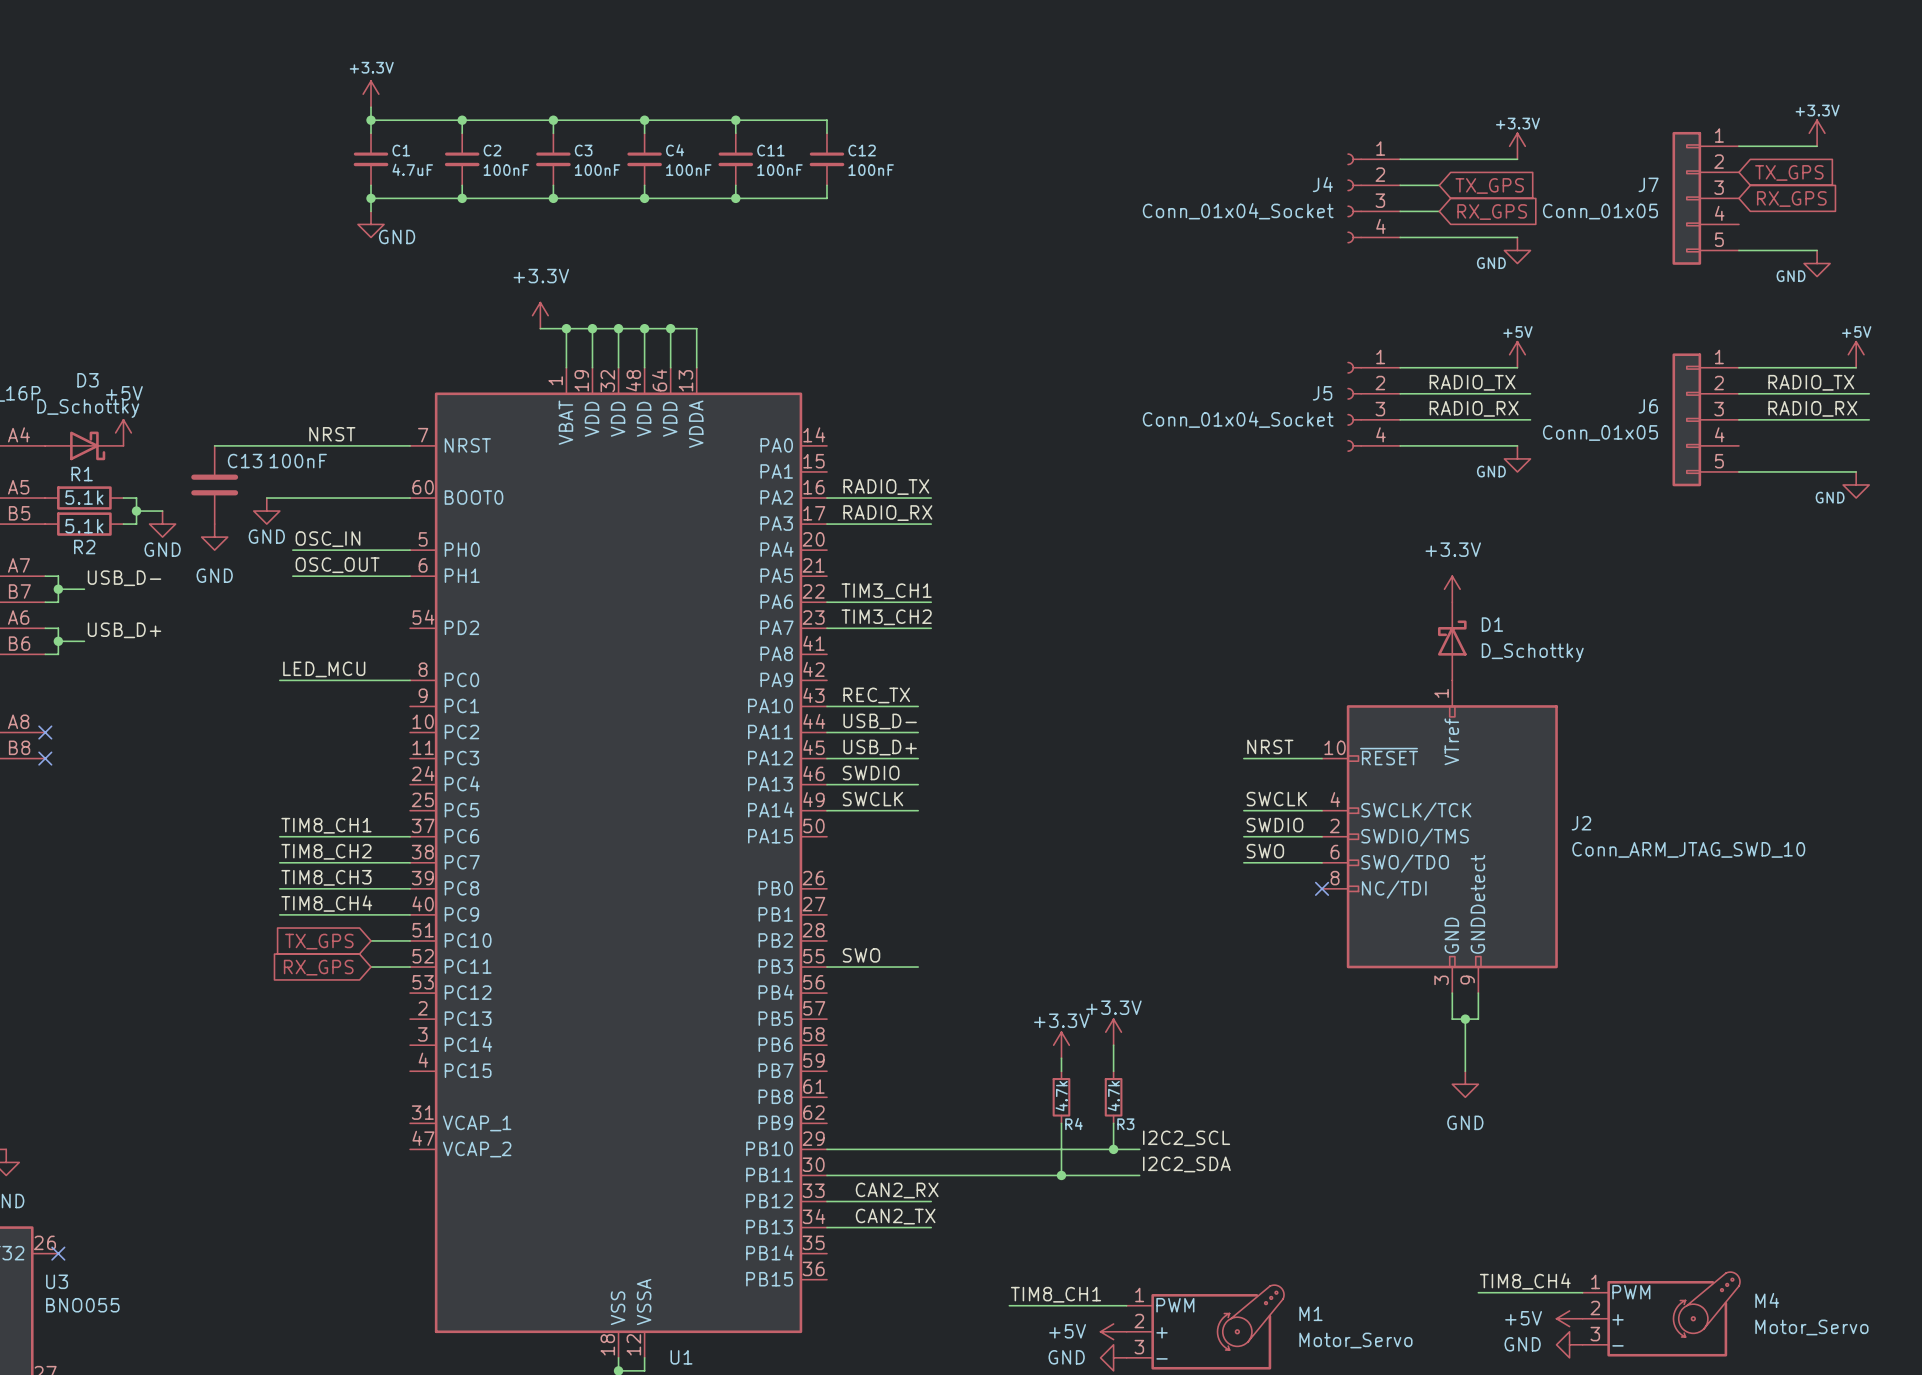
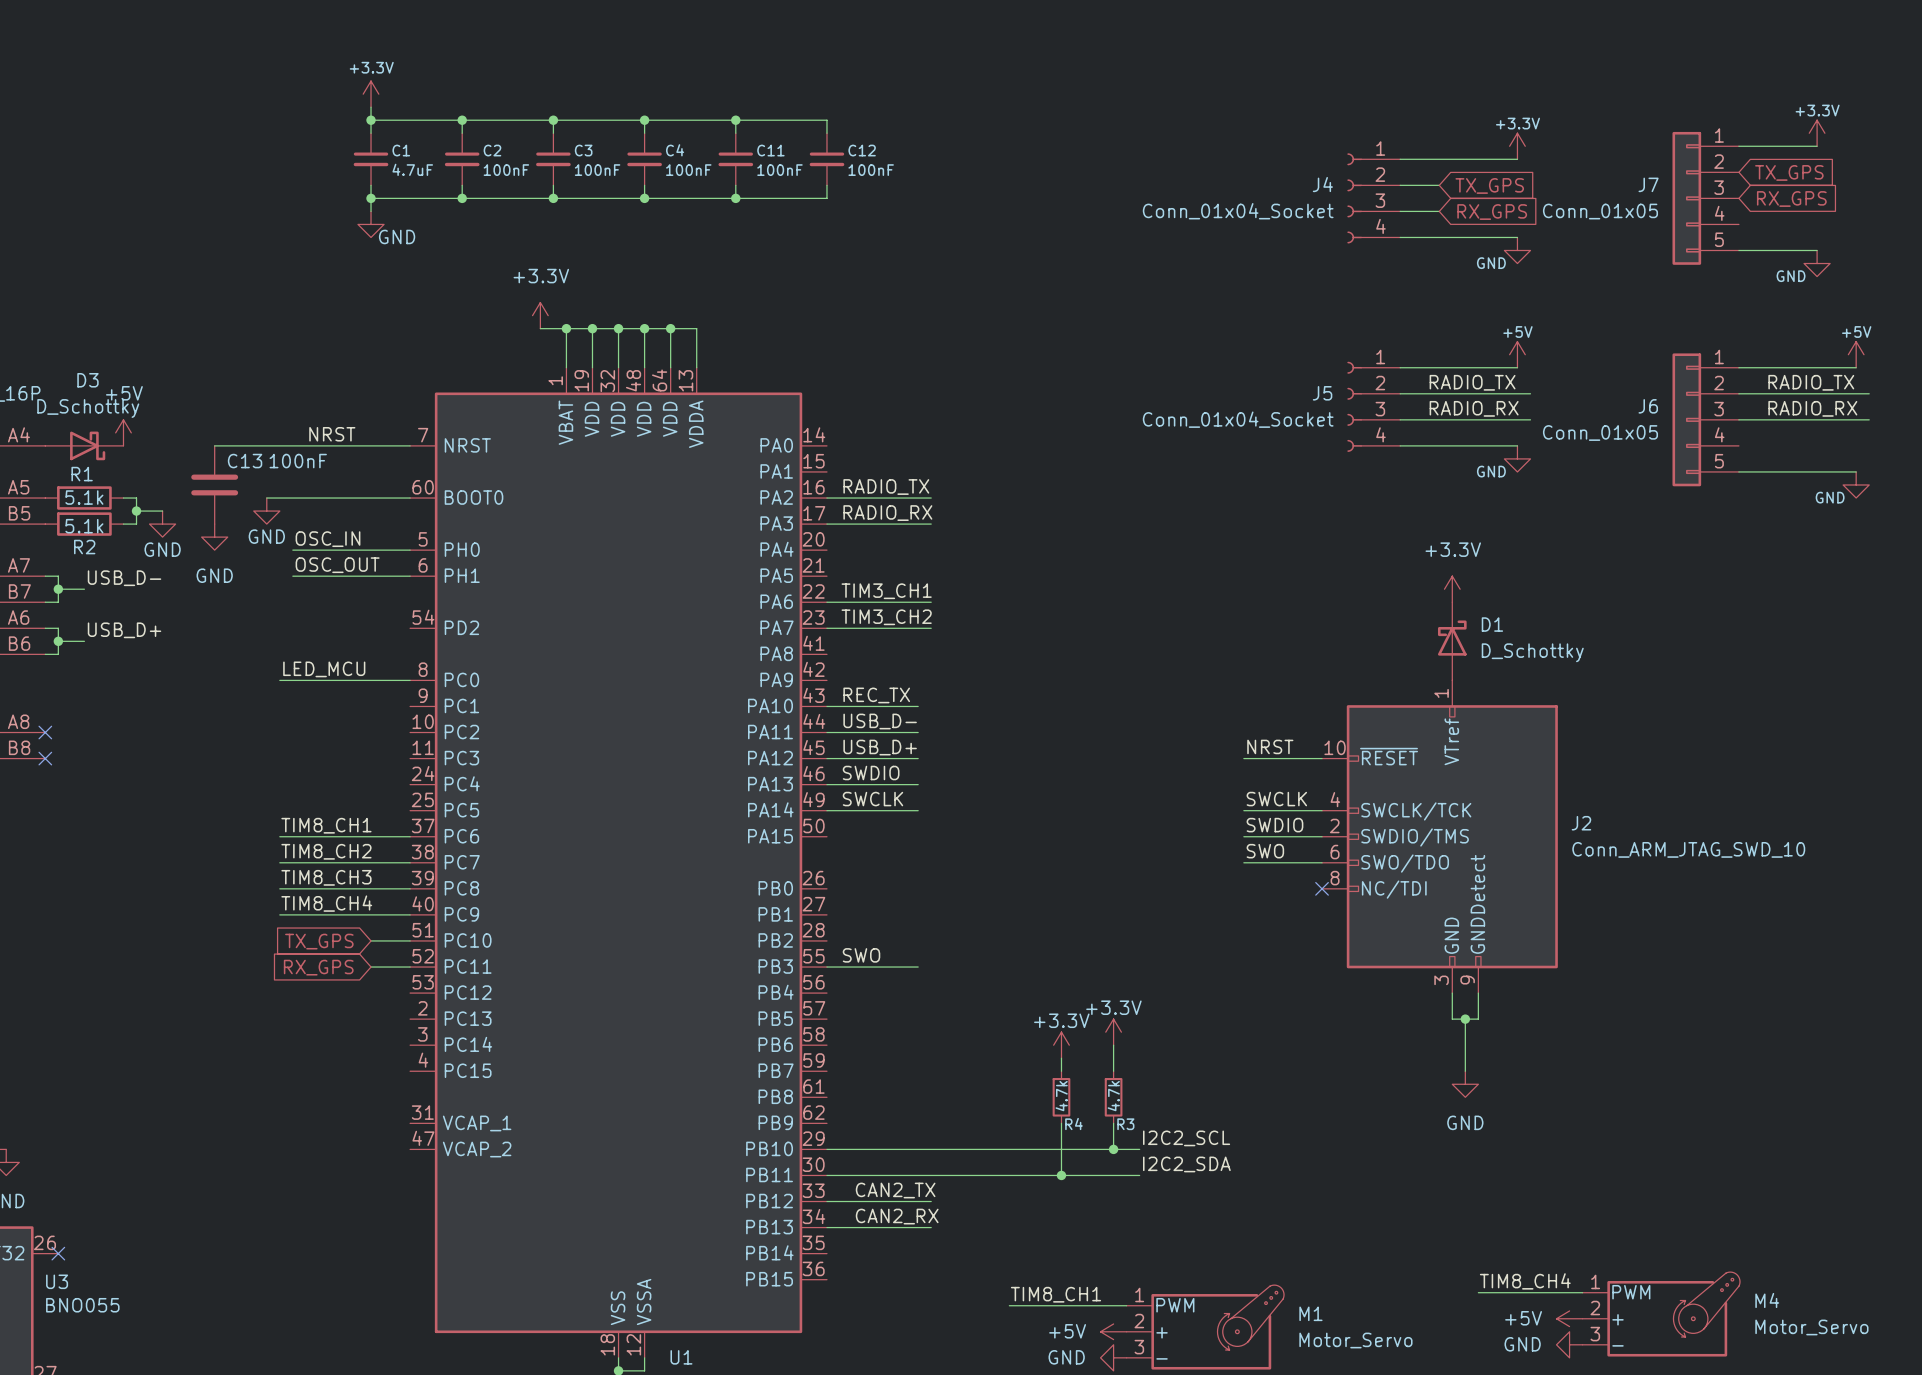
label: CAN2_RX (897, 1190) -> CAN2_TX (895, 1190)
label: CAN2_TX (895, 1216) -> CAN2_RX (897, 1216)

